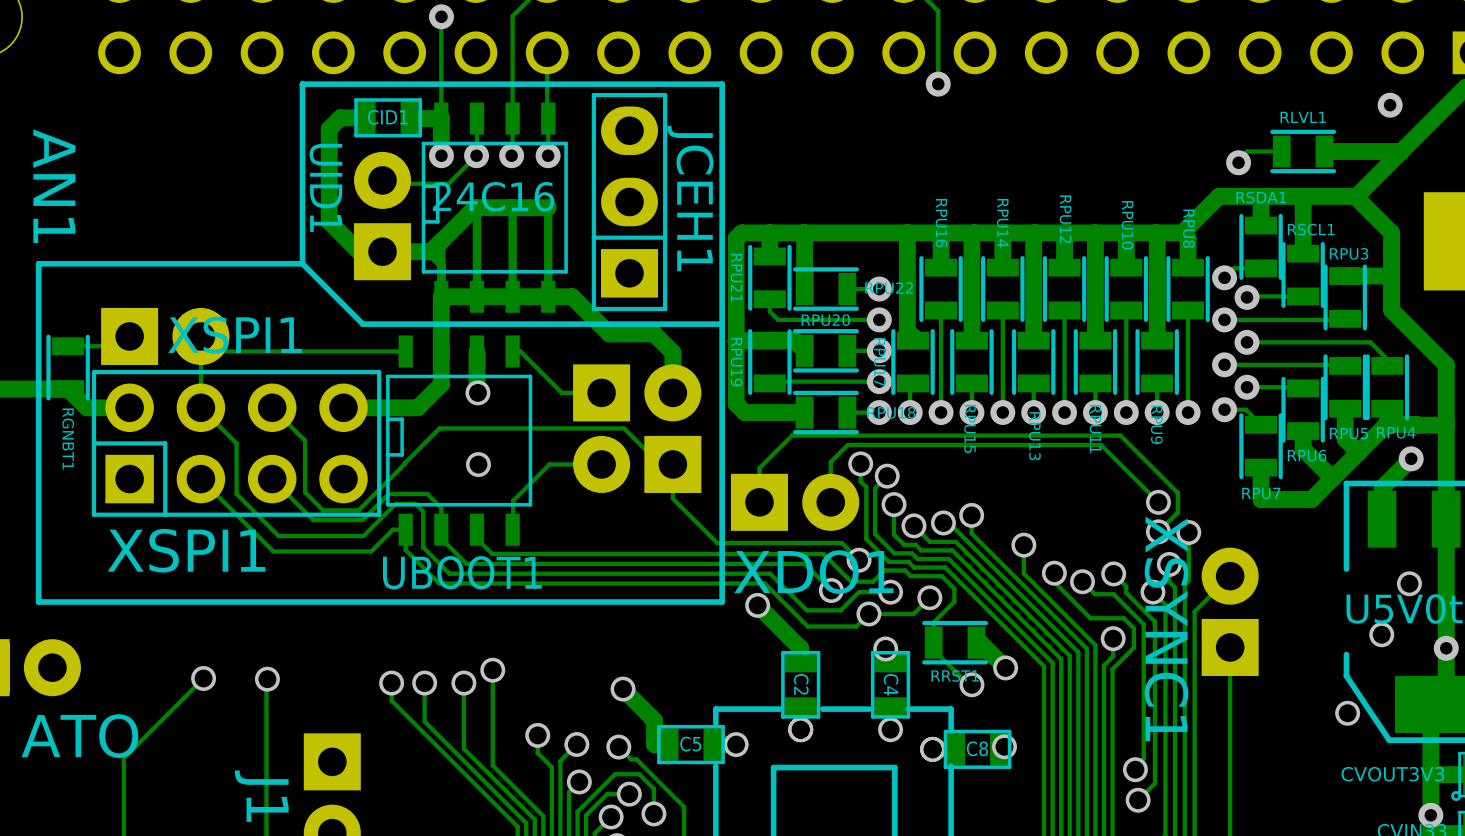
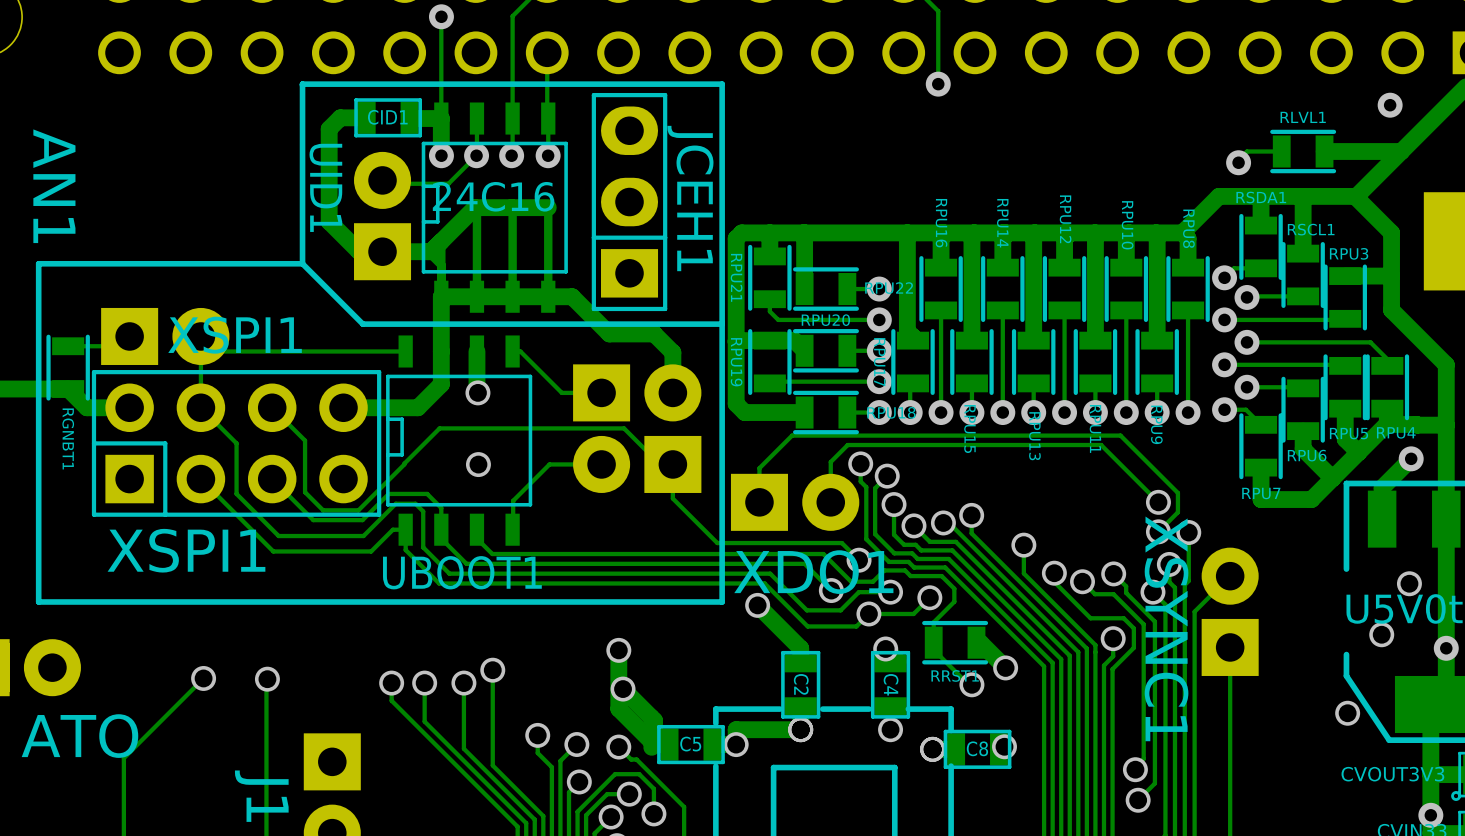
track: none -> (618, 650) (618, 708) (654, 744) (651, 747)
via: none -> (618, 650)
track: none -> (800, 729) (736, 729) (736, 744)

